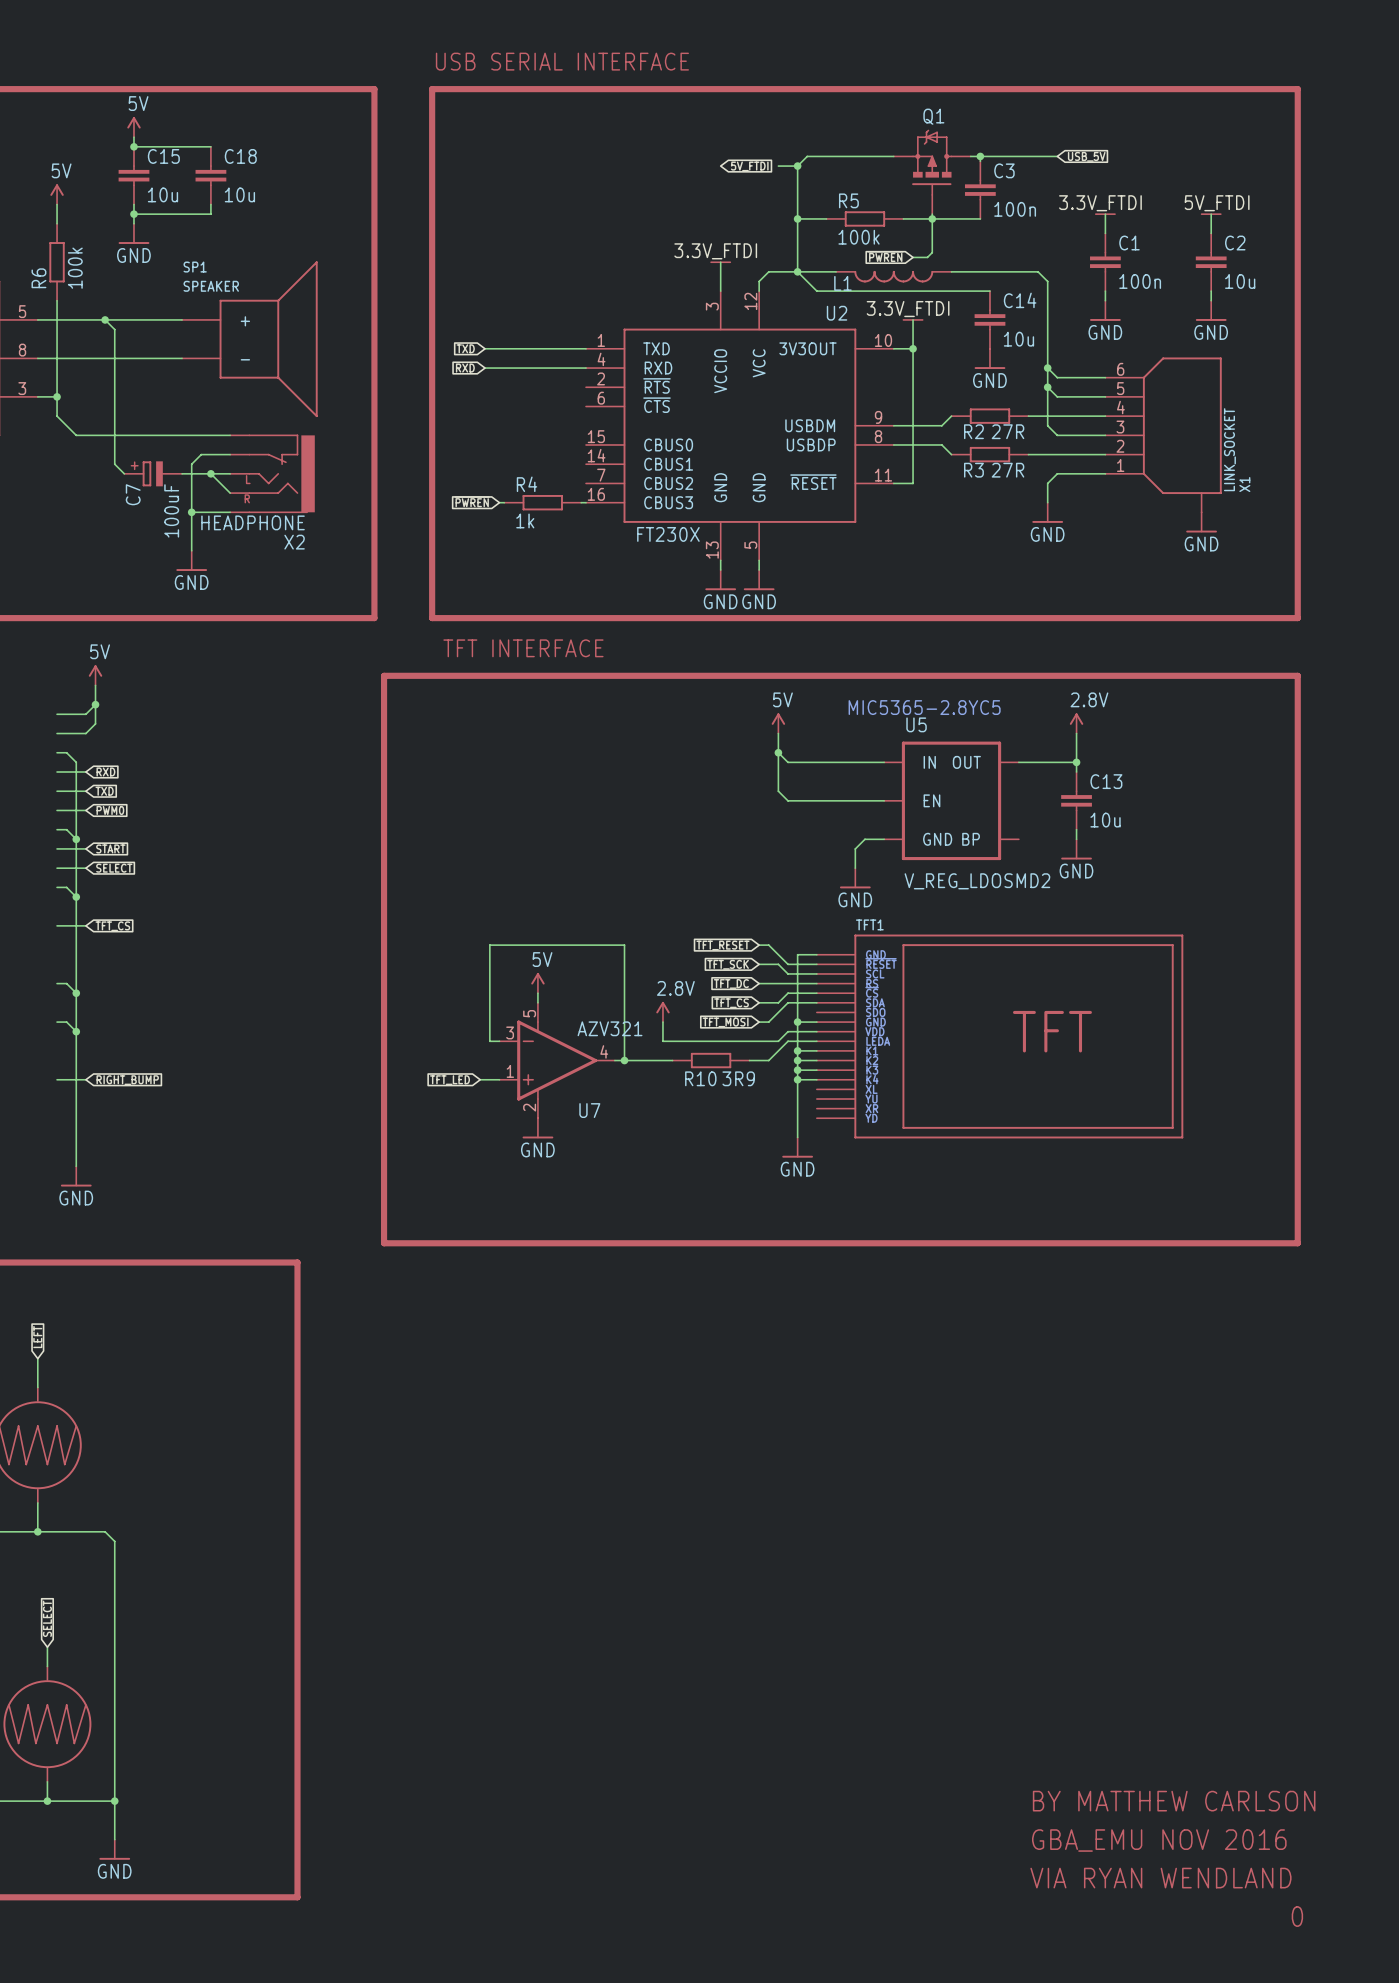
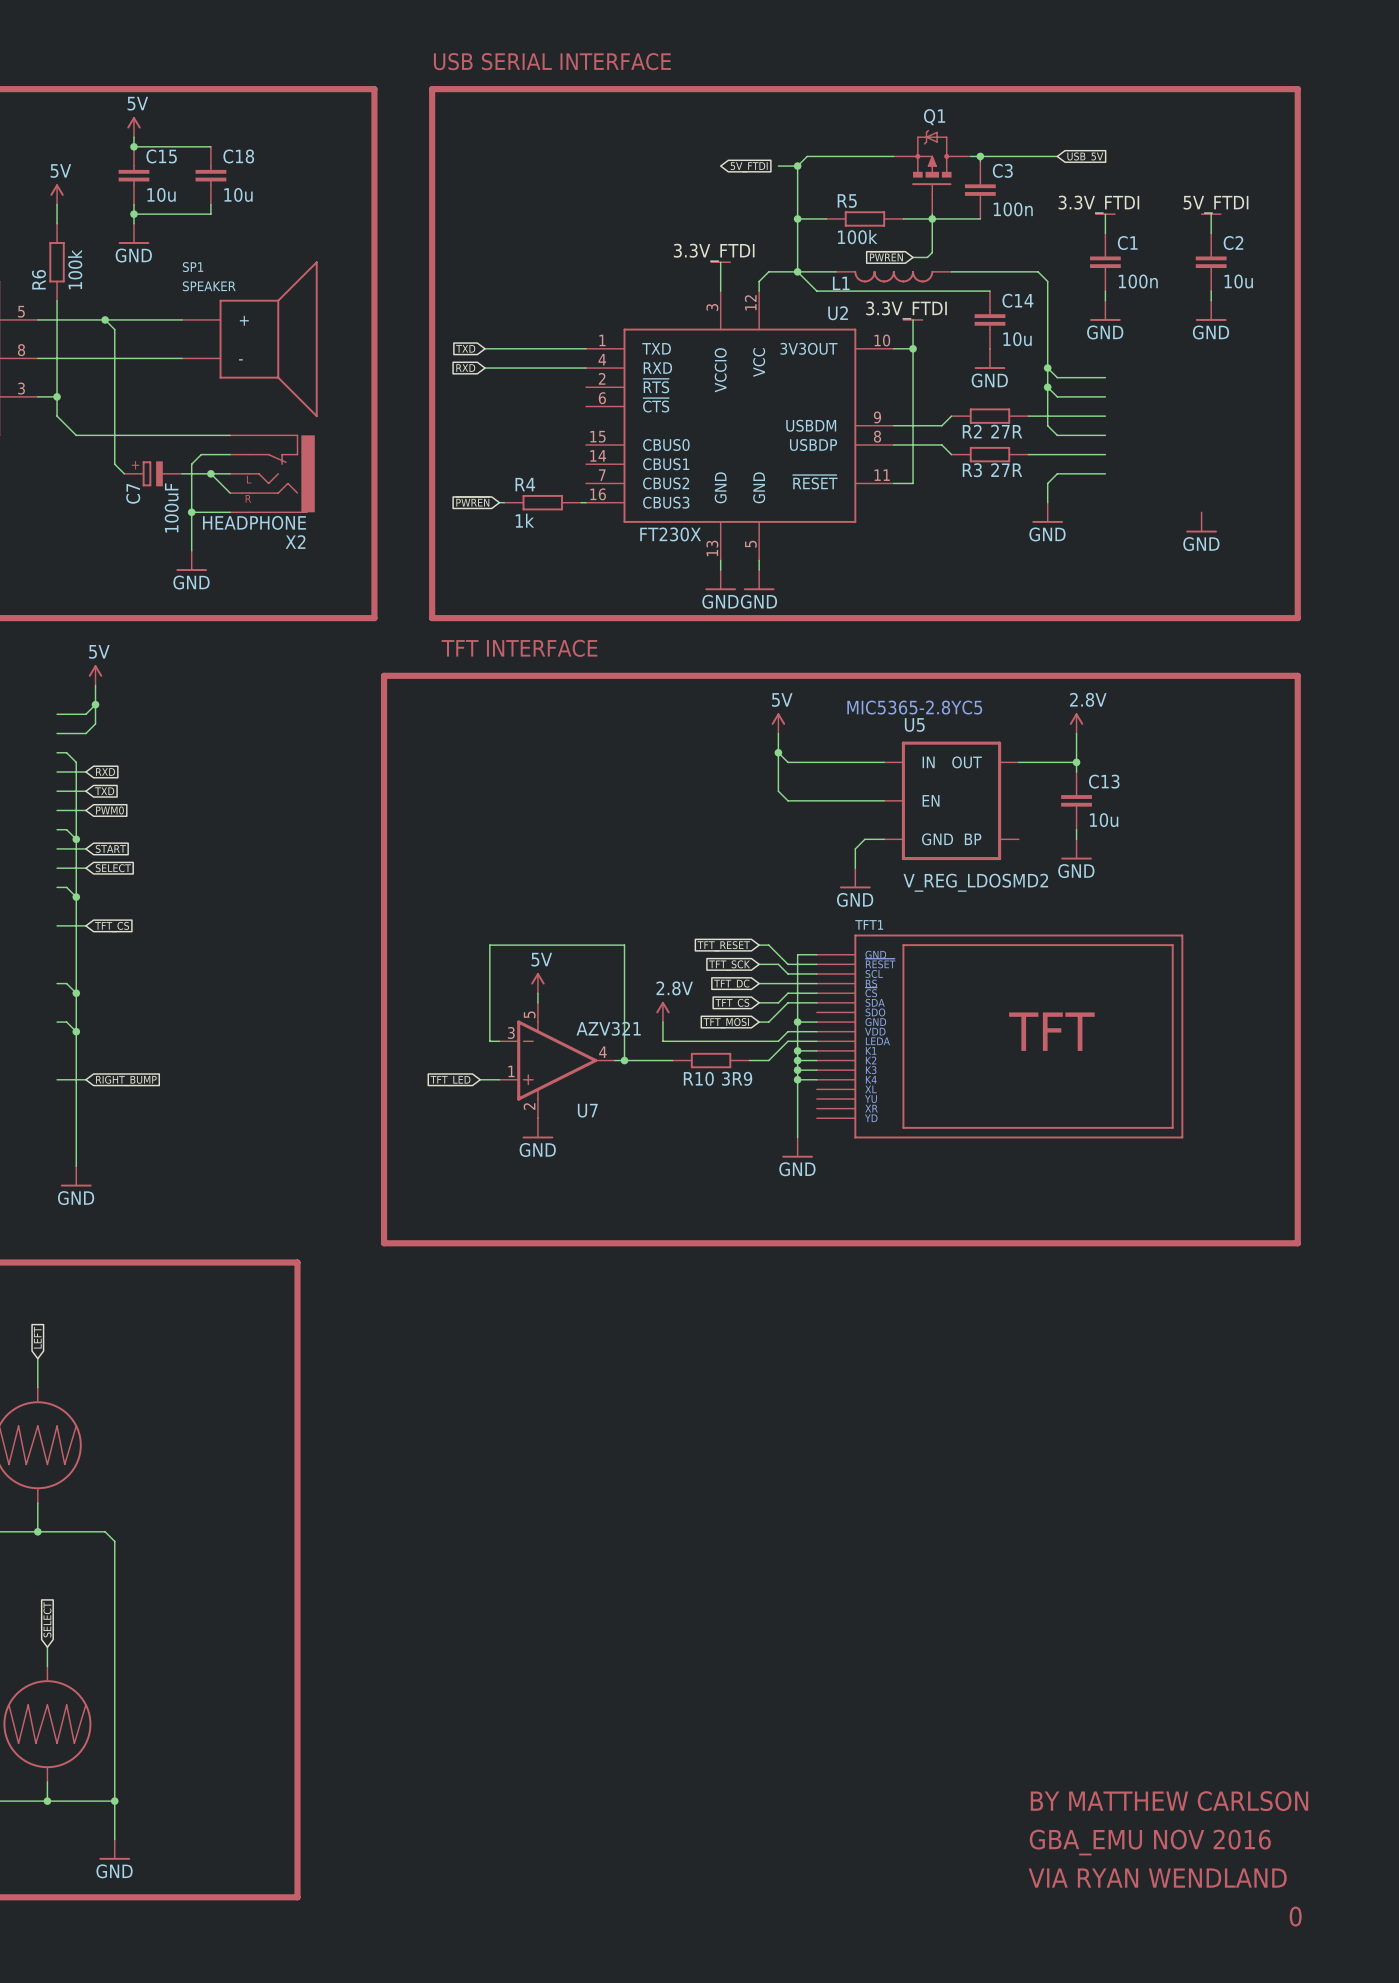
X1: LINK_SOCKET (1163, 434) -> none

